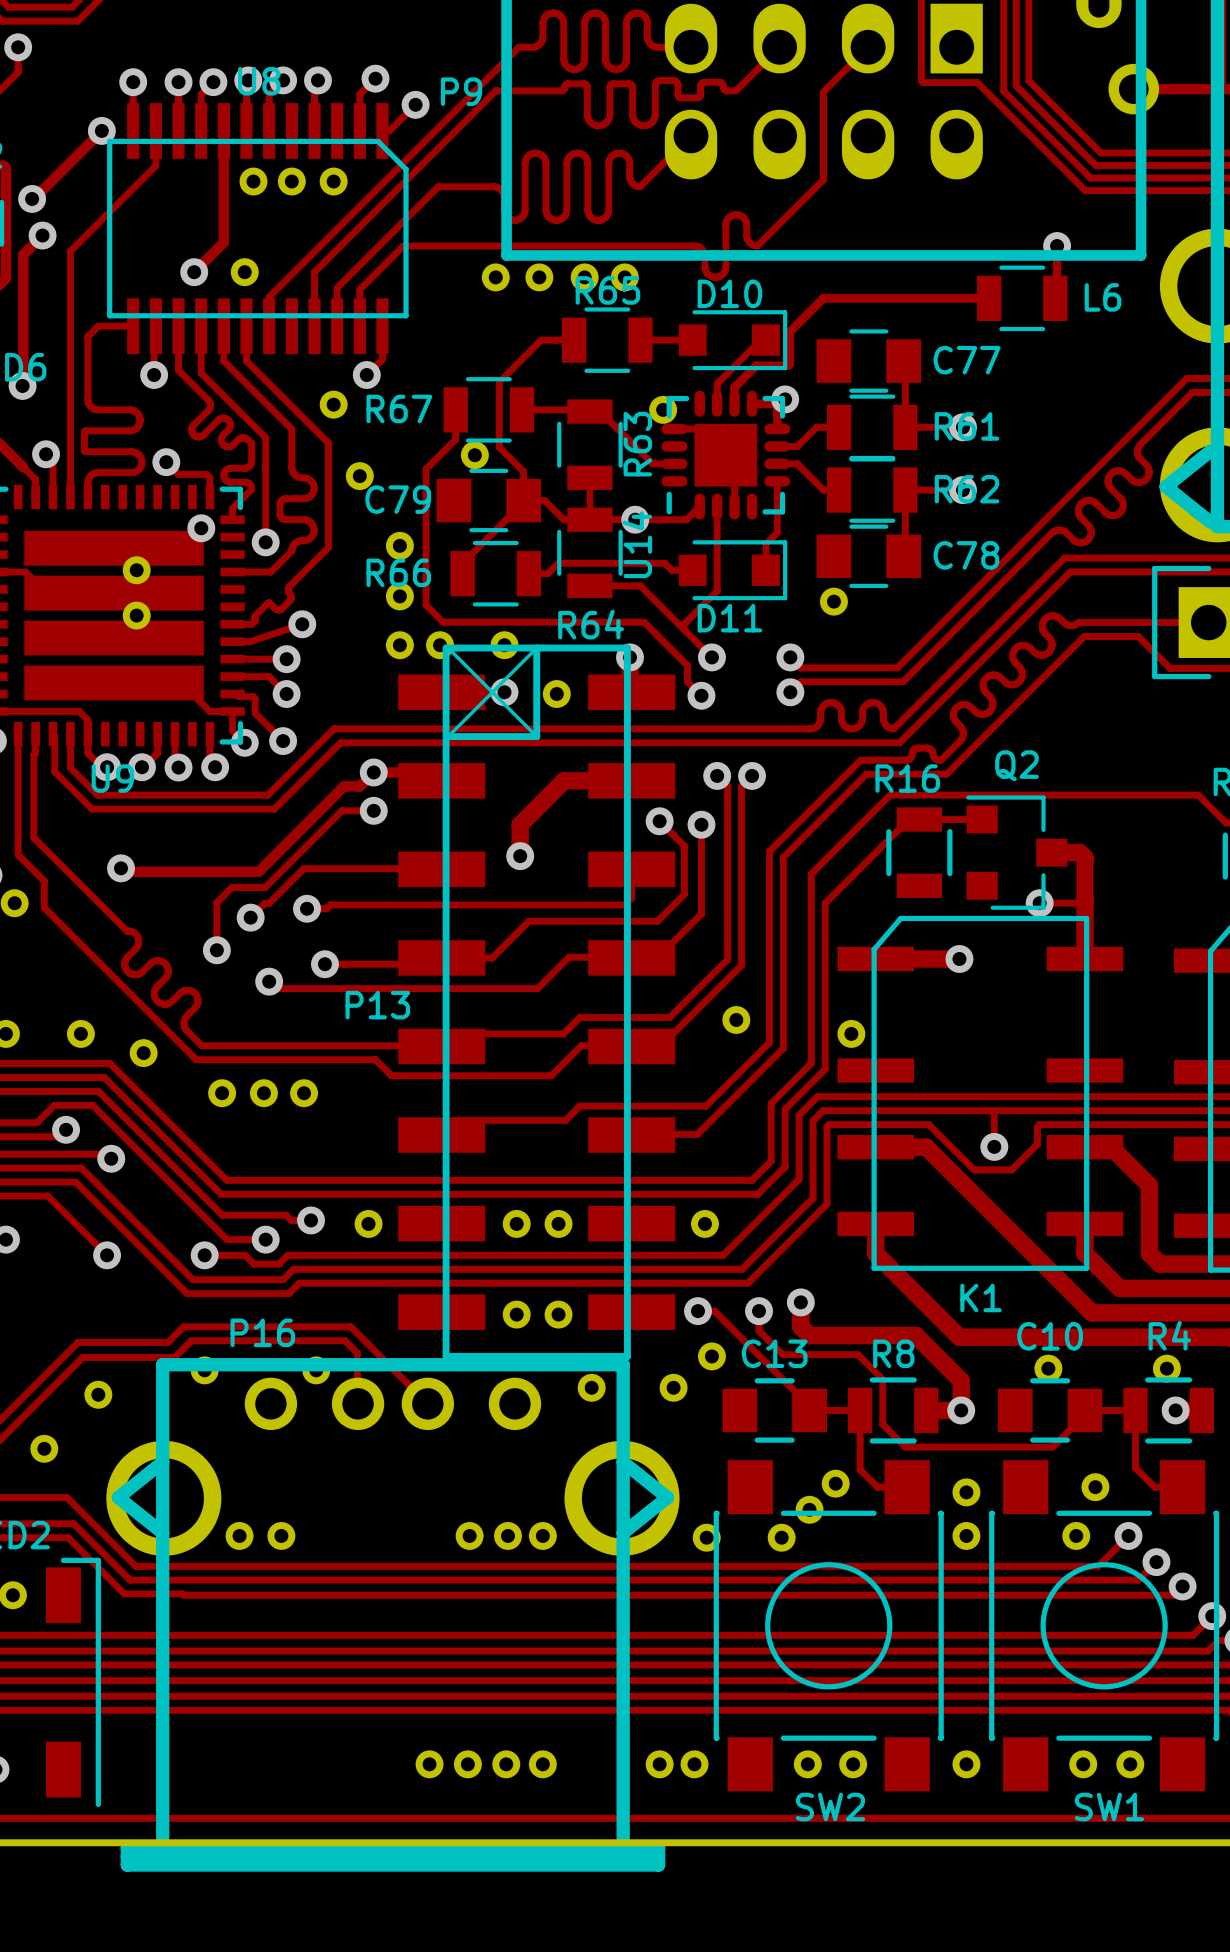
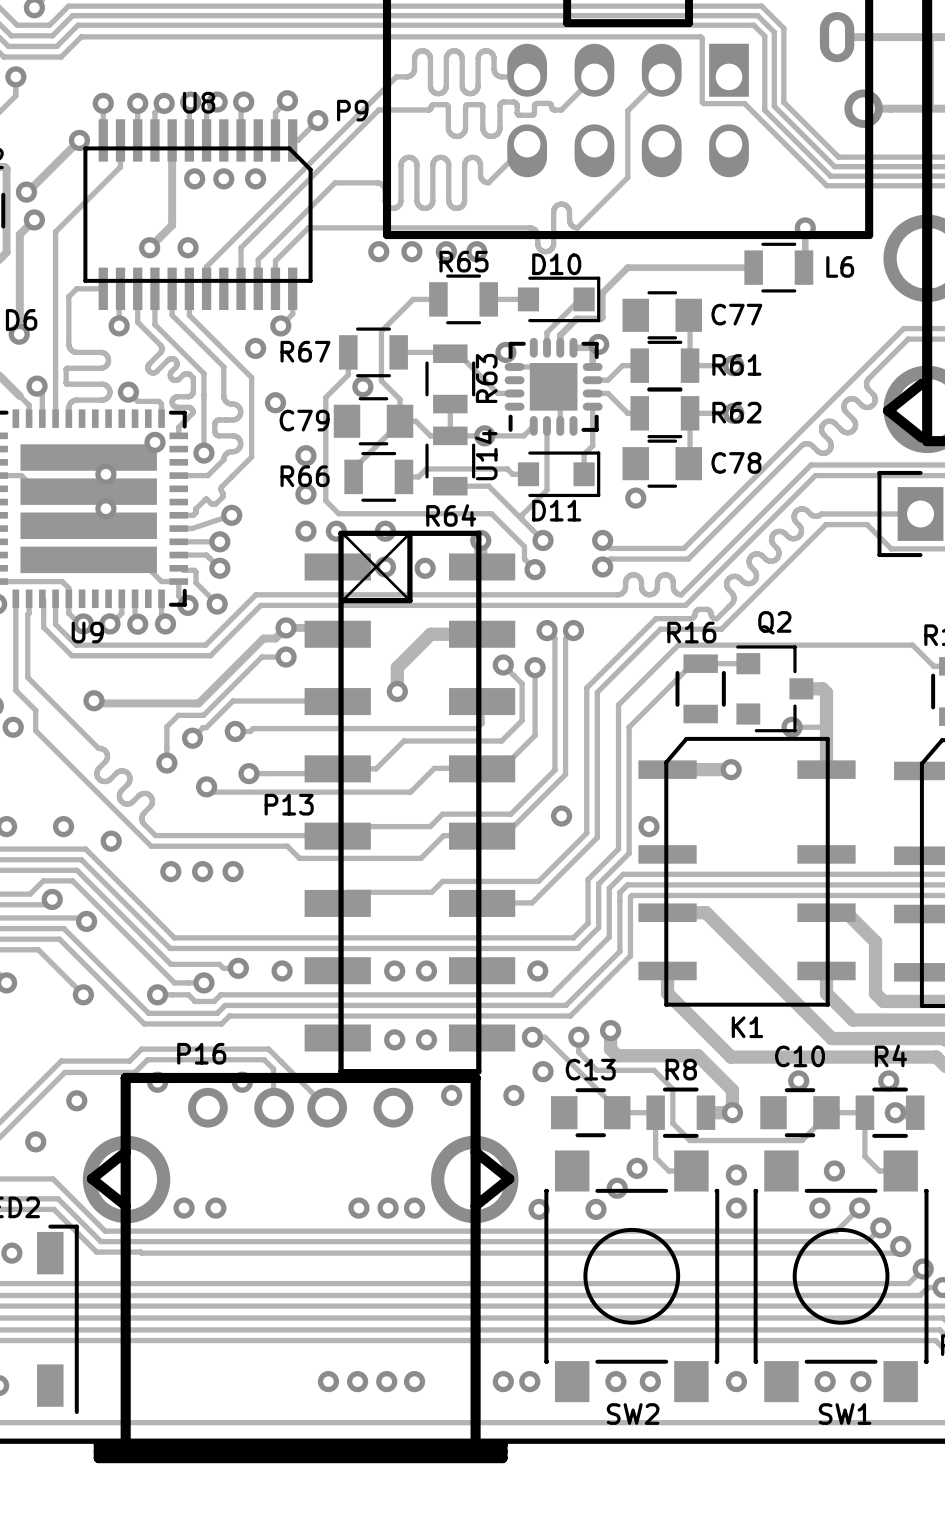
track: (990, 1110) (994, 1114) (994, 1146) -> none
track: (928, 1124) (974, 1169) (1011, 1169) (1037, 1144) (1037, 1126) (1039, 1124) -> (707, 895) (792, 895)
via: (994, 1146) -> none

